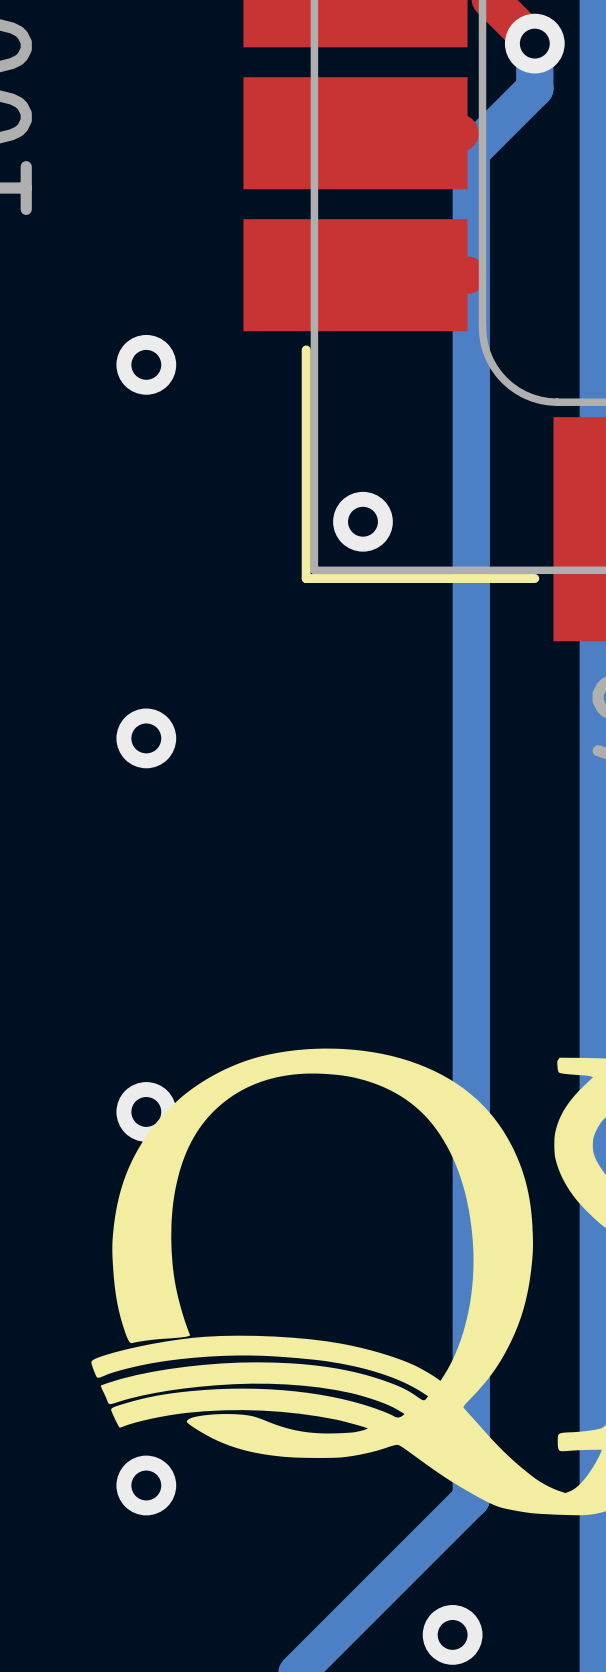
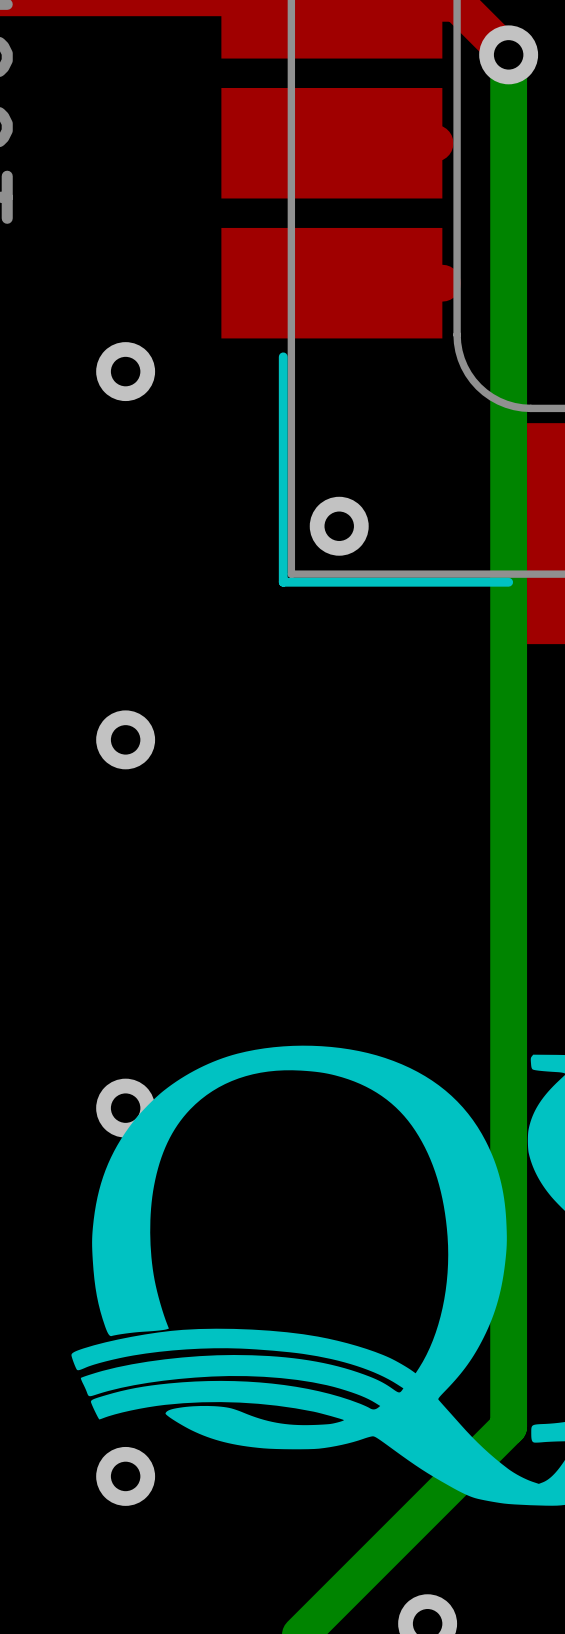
bottom track: (534, 88) (471, 151) (471, 1498) -> (508, 99) (508, 1426) (446, 1489)

